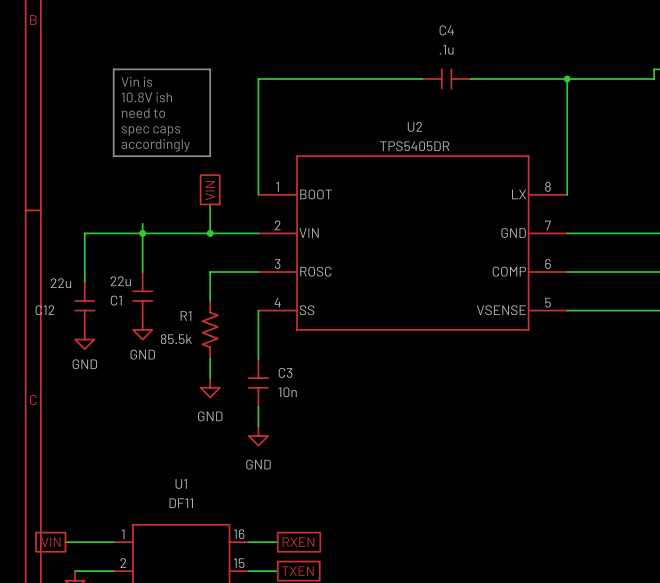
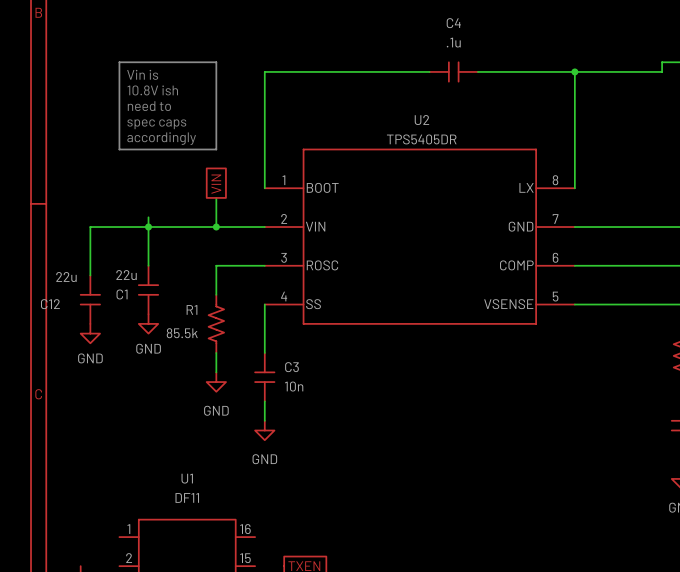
global label: VIN (50, 542) -> none
wire: (65, 542) (113, 542) -> none
wire: (248, 542) (277, 542) -> none
global label: RXEN (298, 542) -> none
wire: (75, 571) (113, 571) -> none
wire: (248, 571) (277, 571) -> none

